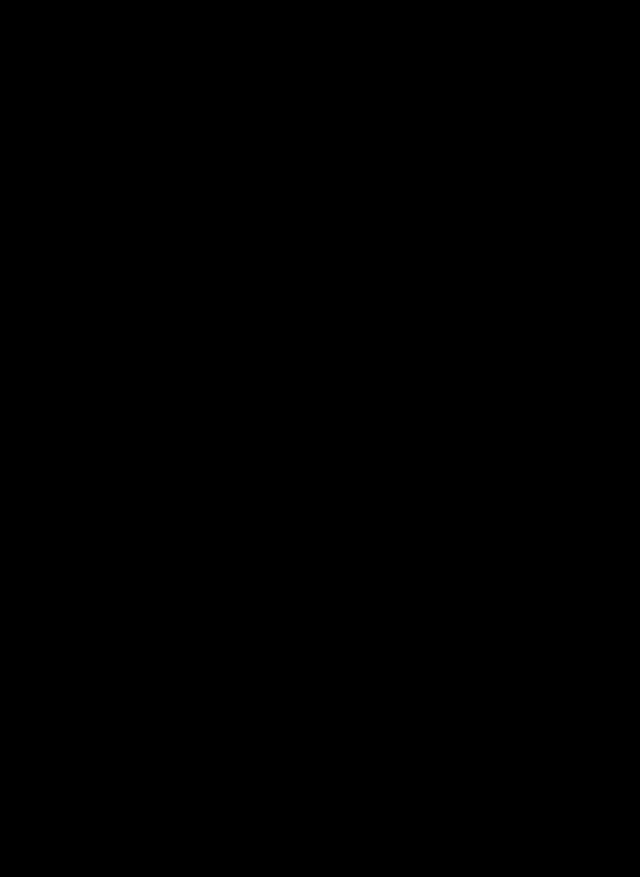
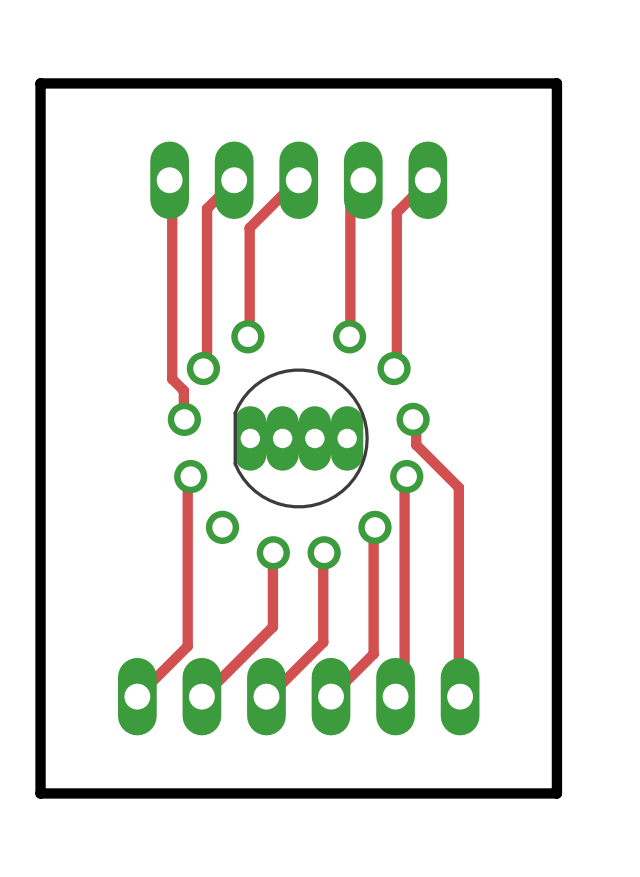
board edge: none -> (40, 83) (40, 793) (556, 793) (556, 83) (40, 83)
track: none -> (169, 180) (172, 181) (172, 379) (183, 390) (184, 419)
track: none -> (234, 180) (207, 208) (207, 367) (203, 368)
track: none -> (298, 180) (249, 228) (249, 336) (247, 336)
part: none -> (298, 180)
track: none -> (363, 180) (350, 193) (349, 336)
track: none -> (427, 180) (396, 212) (396, 367) (394, 368)
track: none -> (413, 419) (416, 421) (416, 444) (458, 487) (460, 696)
part: none -> (301, 438)
part: none -> (298, 444)
track: none -> (190, 476) (187, 479) (187, 646) (137, 696)
track: none -> (406, 476) (404, 479) (404, 688) (395, 696)
track: none -> (374, 527) (373, 654) (331, 696)
track: none -> (273, 552) (272, 626) (201, 696)
track: none -> (324, 552) (323, 642) (269, 696) (266, 696)
part: none -> (298, 696)

